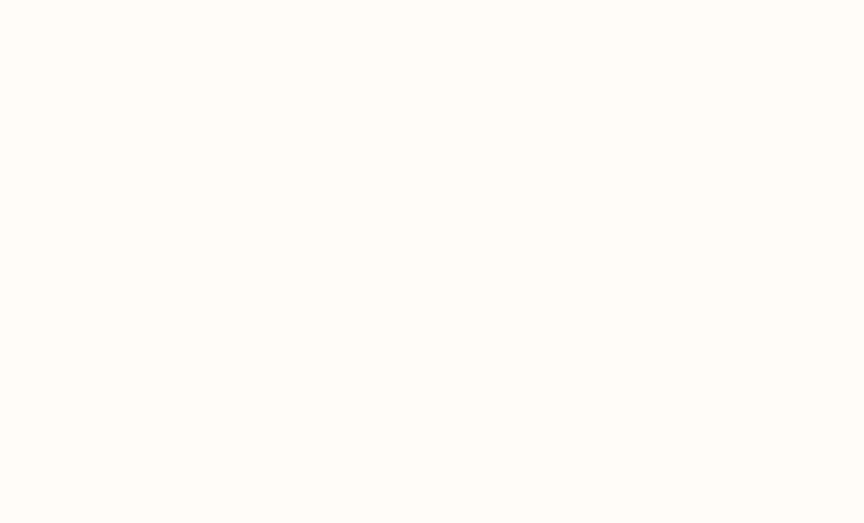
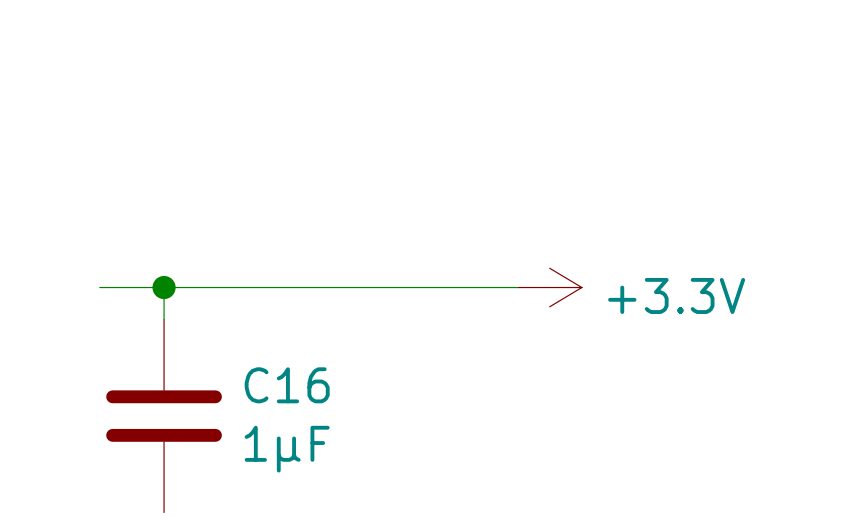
wire: none -> (99, 287) (517, 287)
wire: none -> (164, 287) (164, 319)
junction: none -> (164, 287)
power symbol: none -> +3.3V (549, 287)
C16: none -> 1µF (164, 416)

